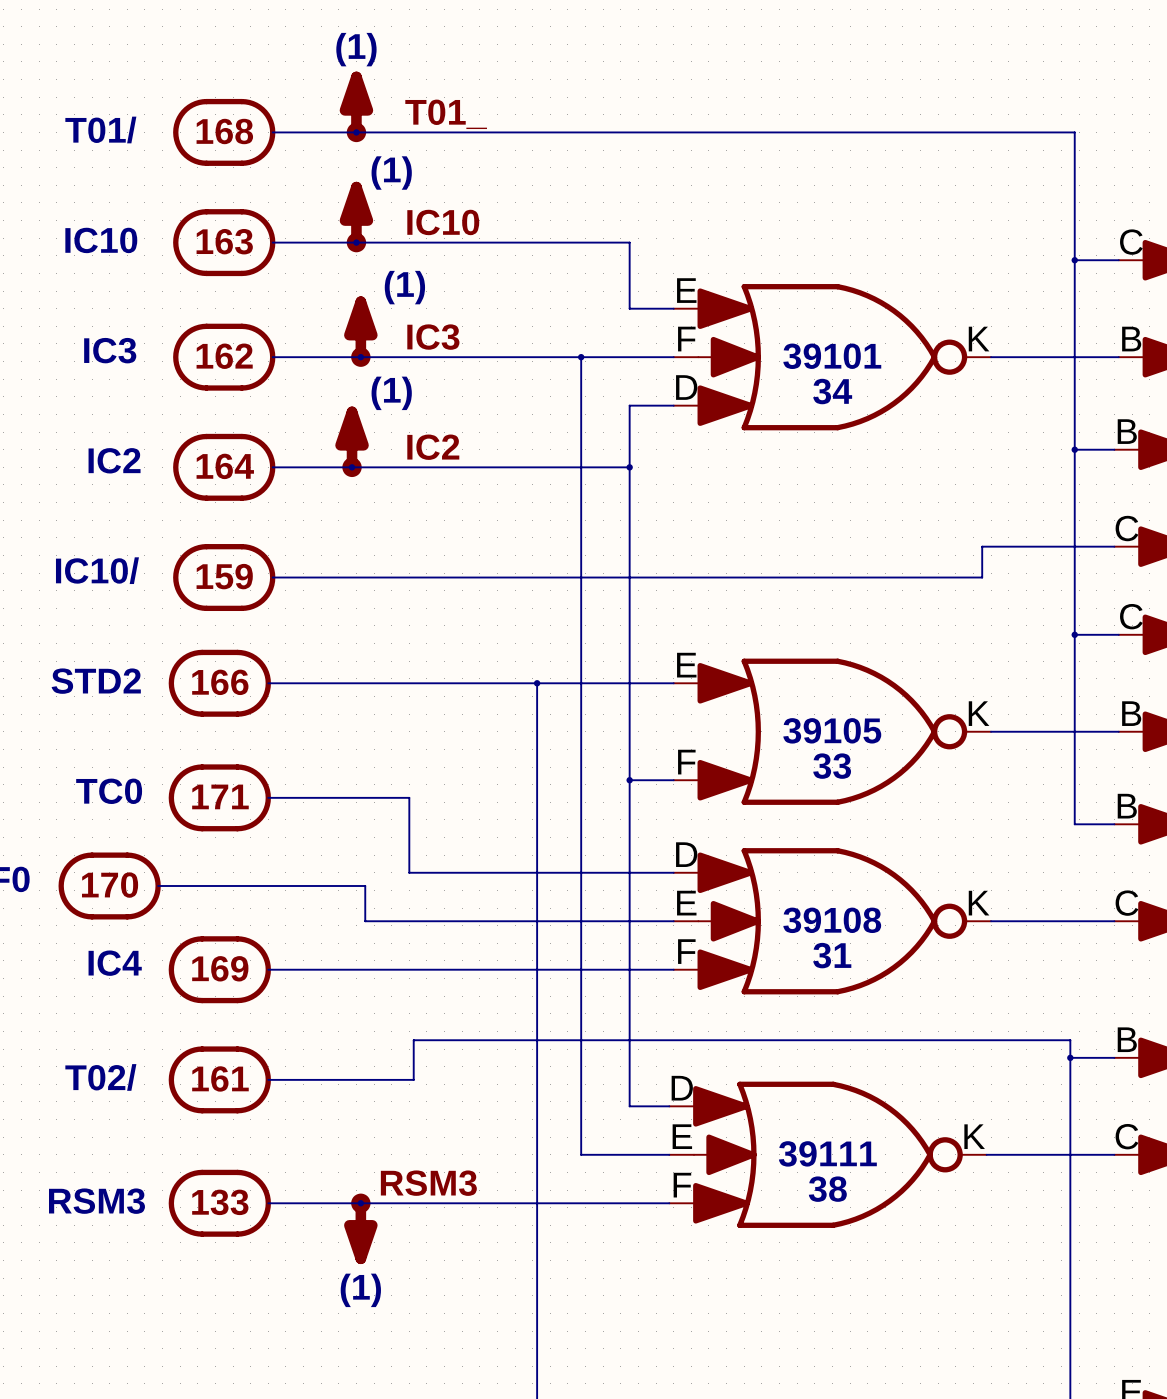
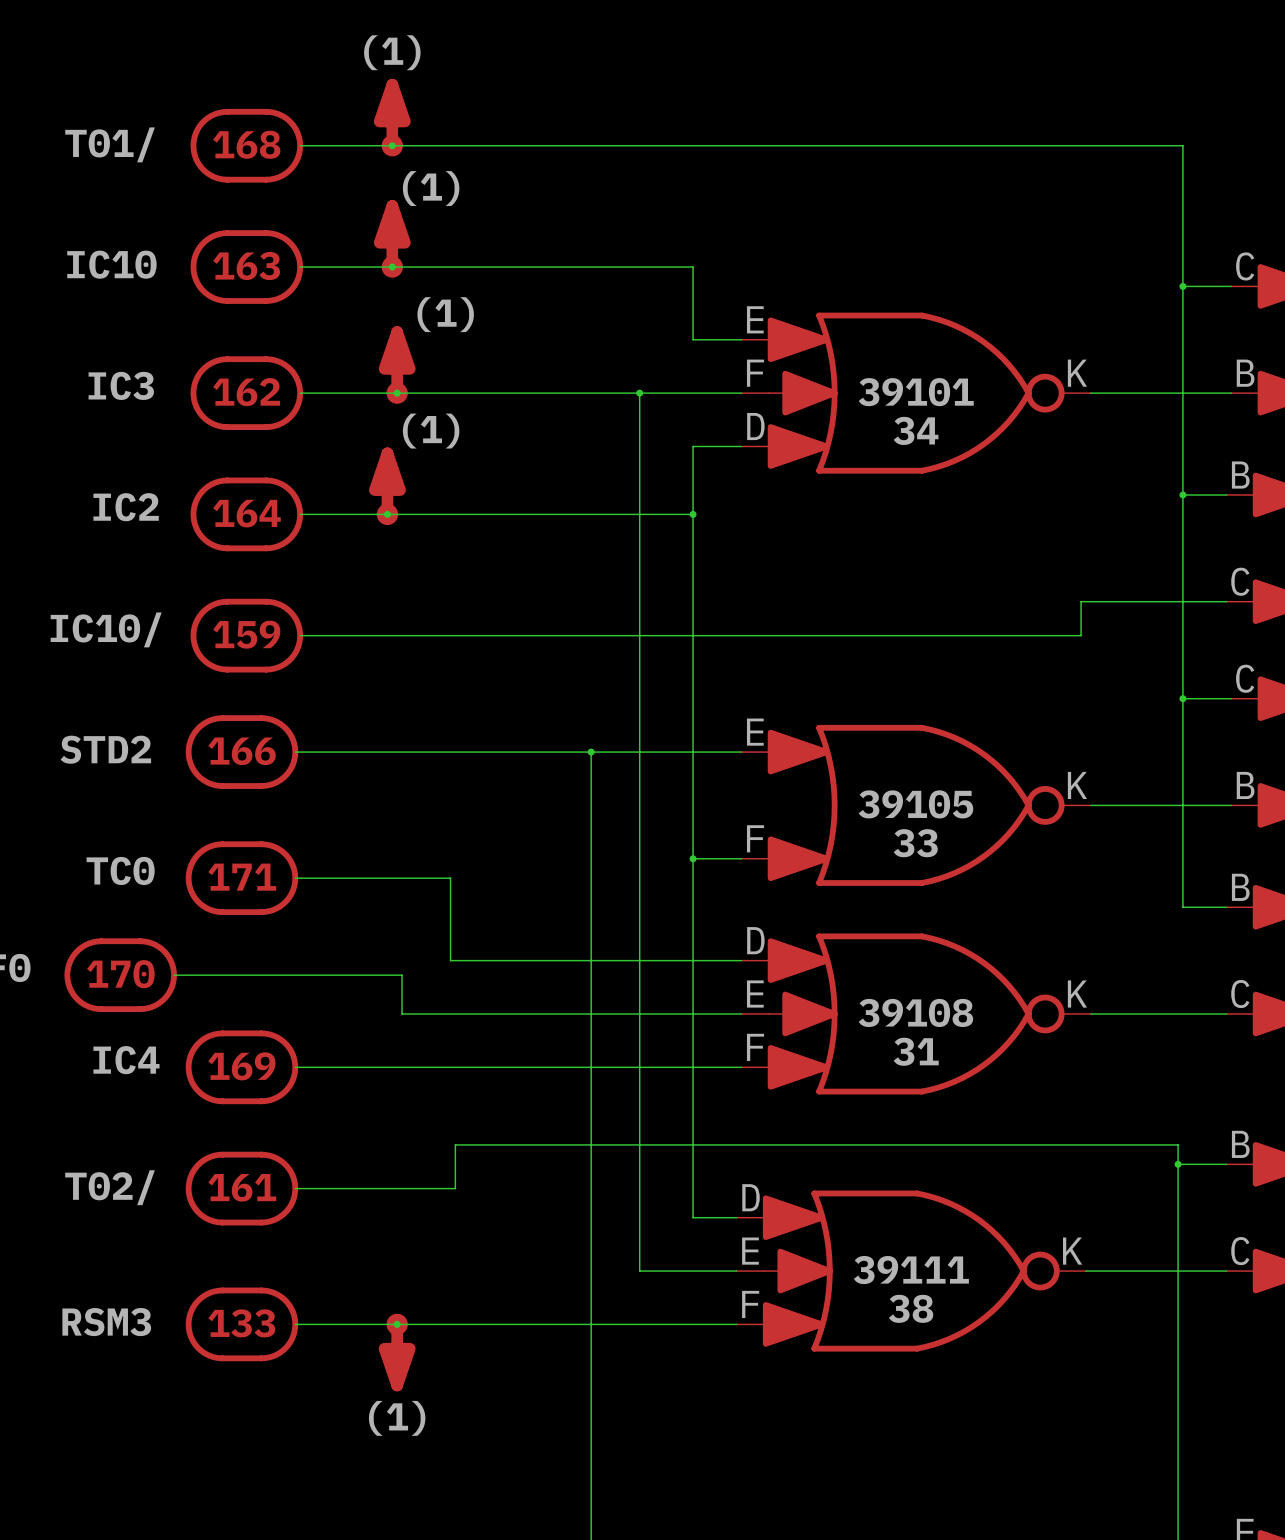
label: T01_ (446, 114) -> none
label: IC10 (443, 222) -> none
label: IC3 (433, 337) -> none
label: IC2 (433, 447) -> none
label: RSM3 (428, 1183) -> none

